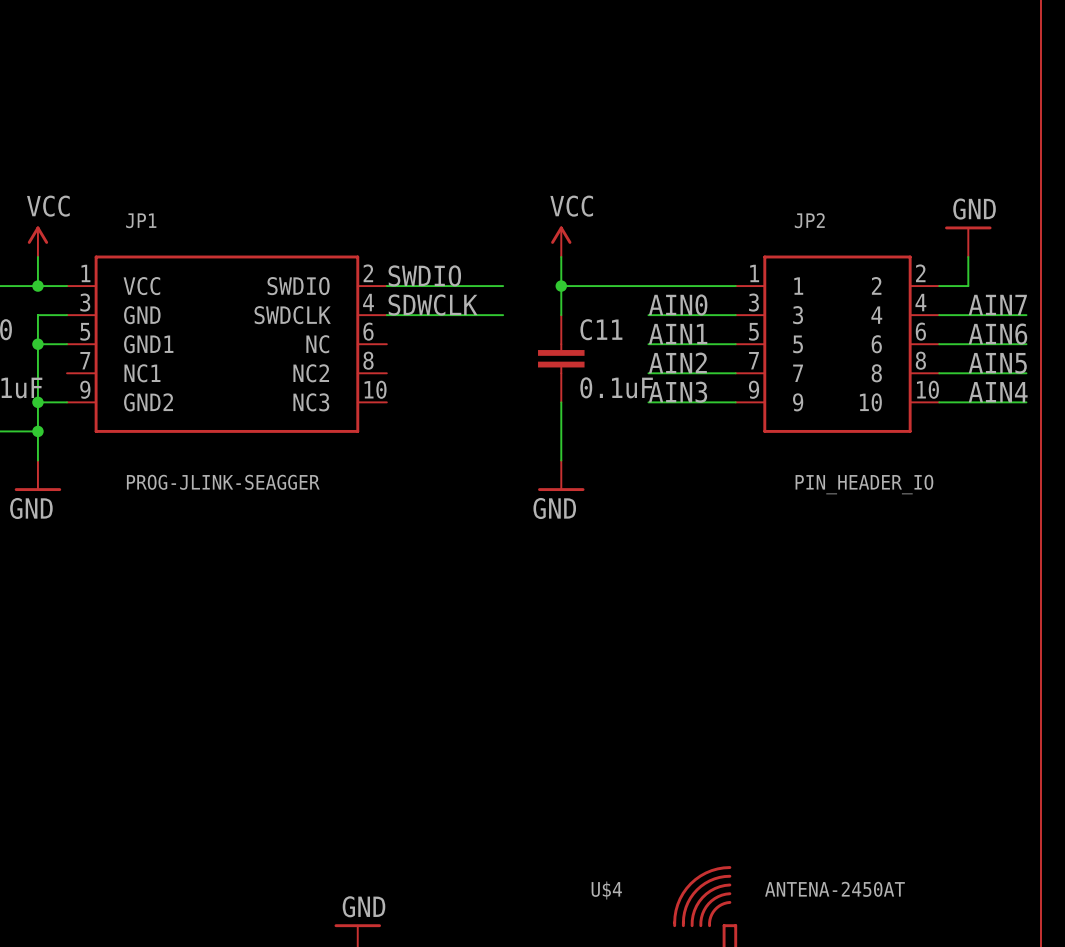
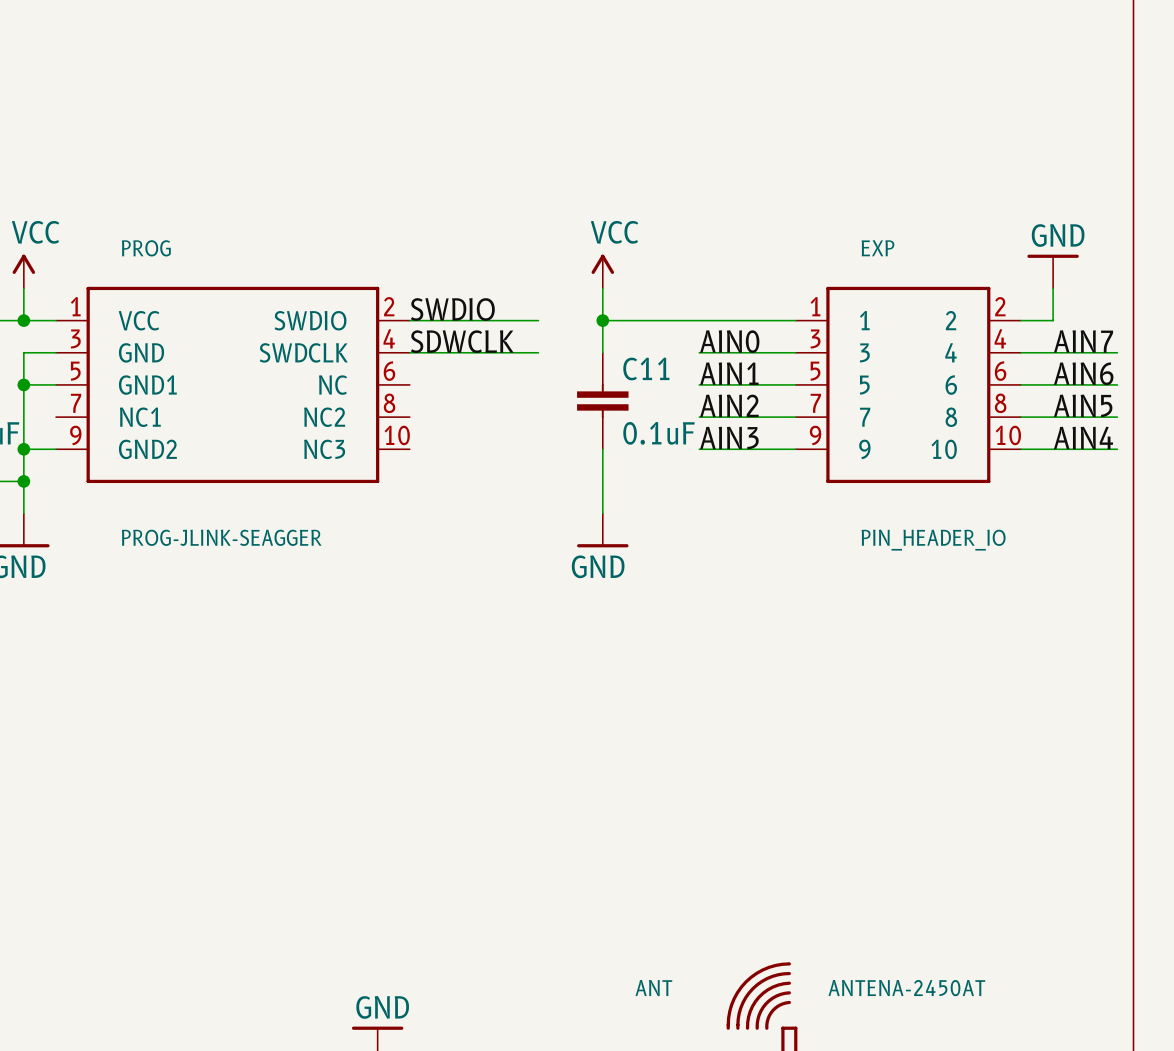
JP1 name: JP1 (141, 220) -> PROG (146, 248)
JP2 name: JP2 (809, 220) -> EXP (877, 248)
U$4 name: U$4 (606, 890) -> ANT (653, 988)

